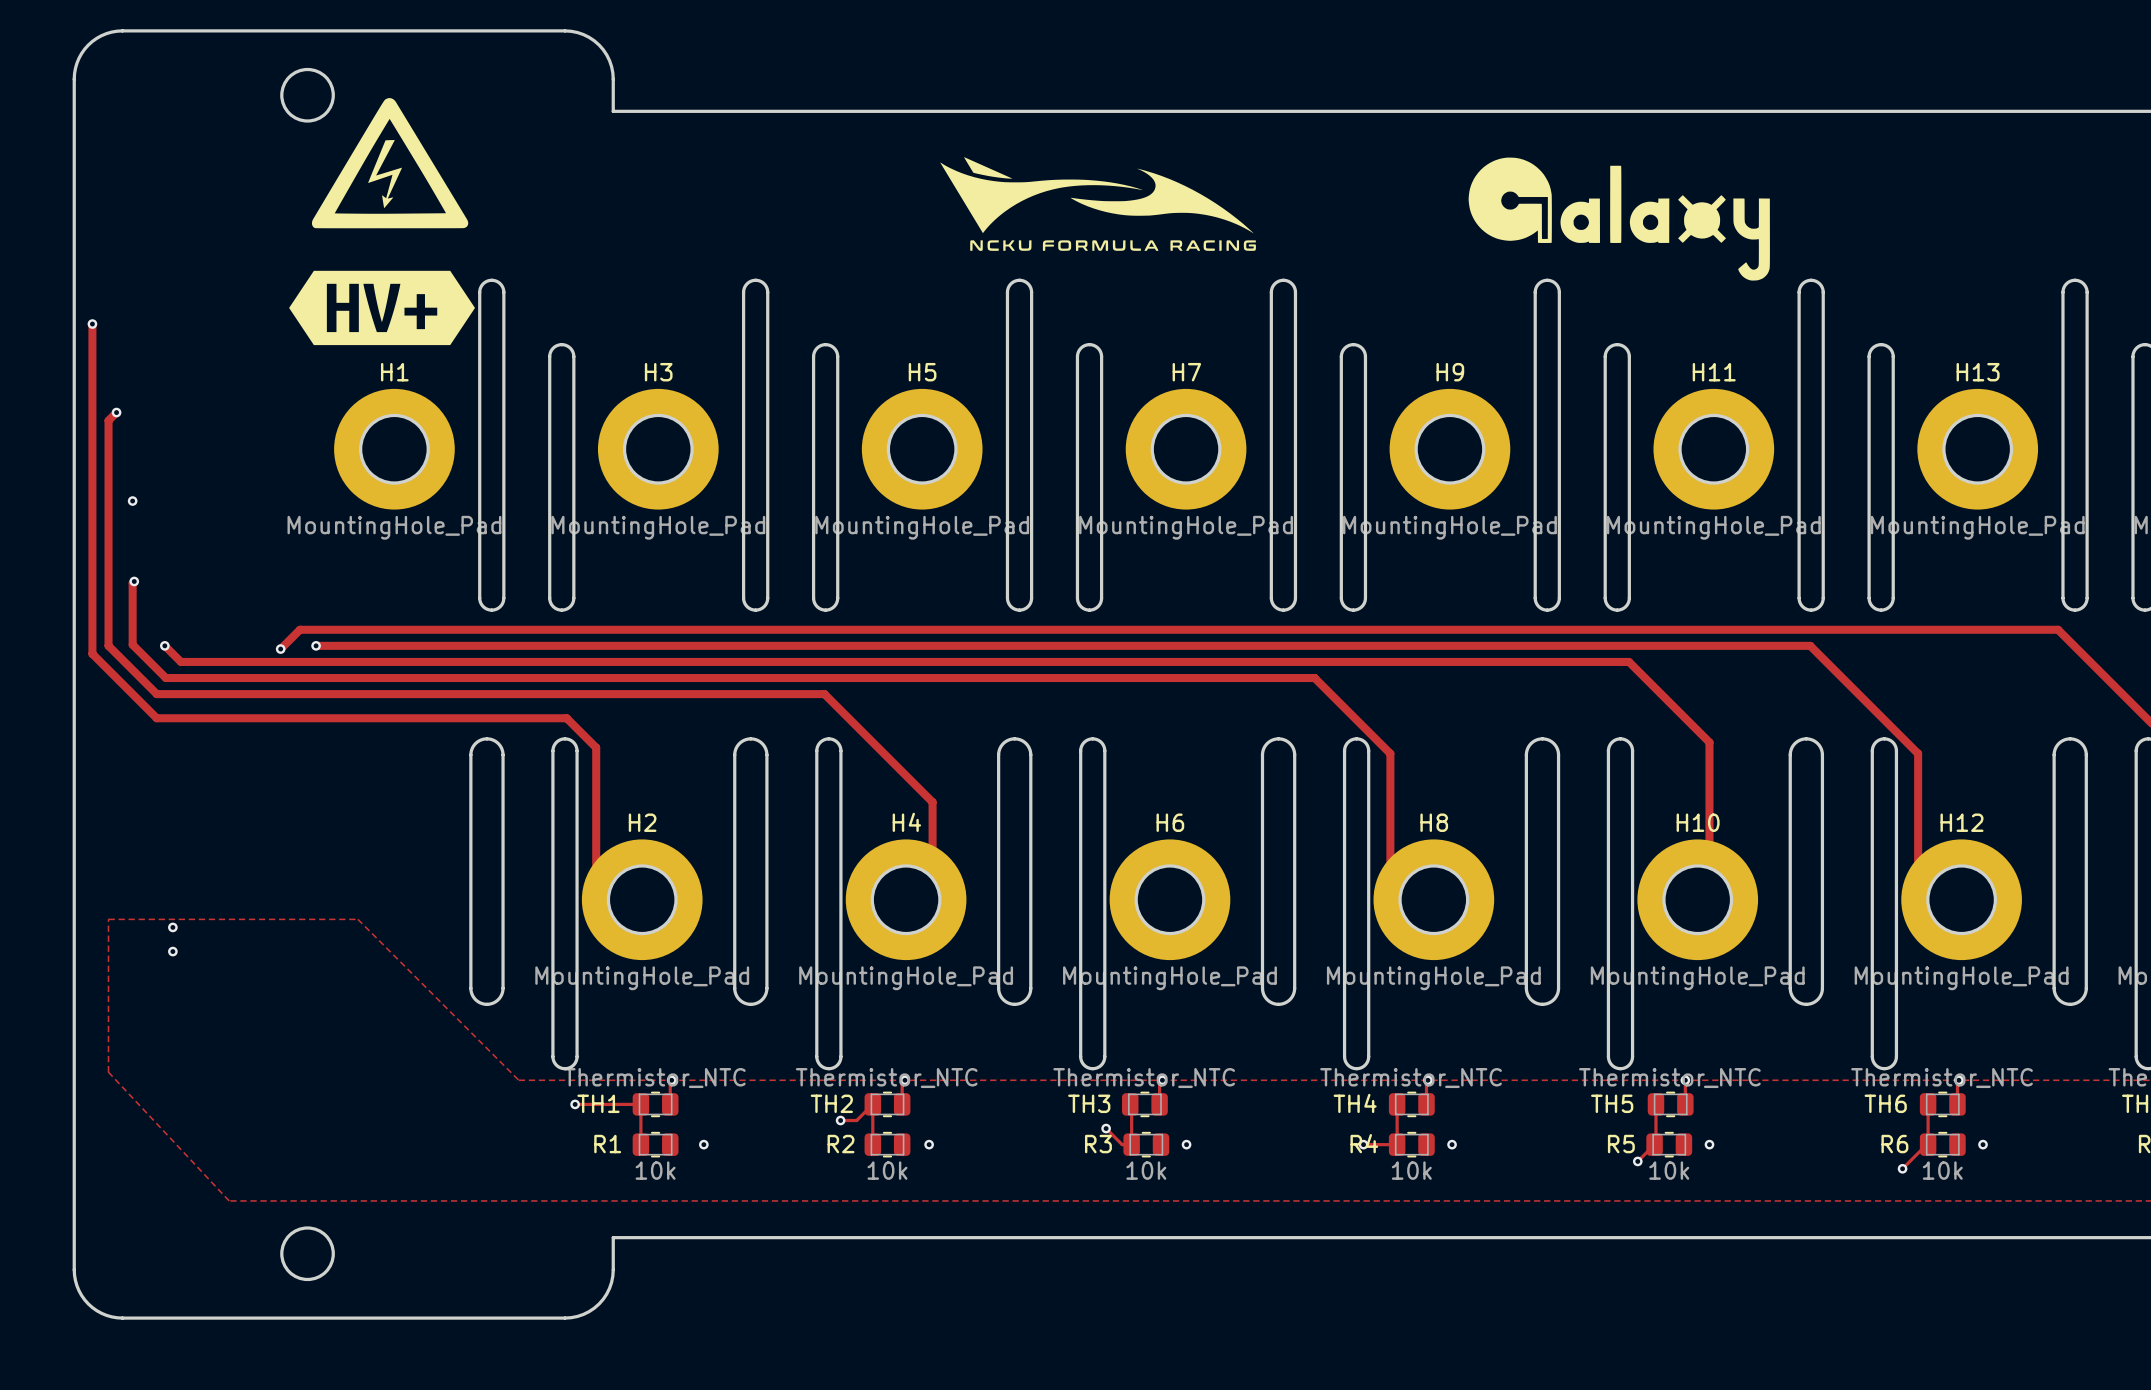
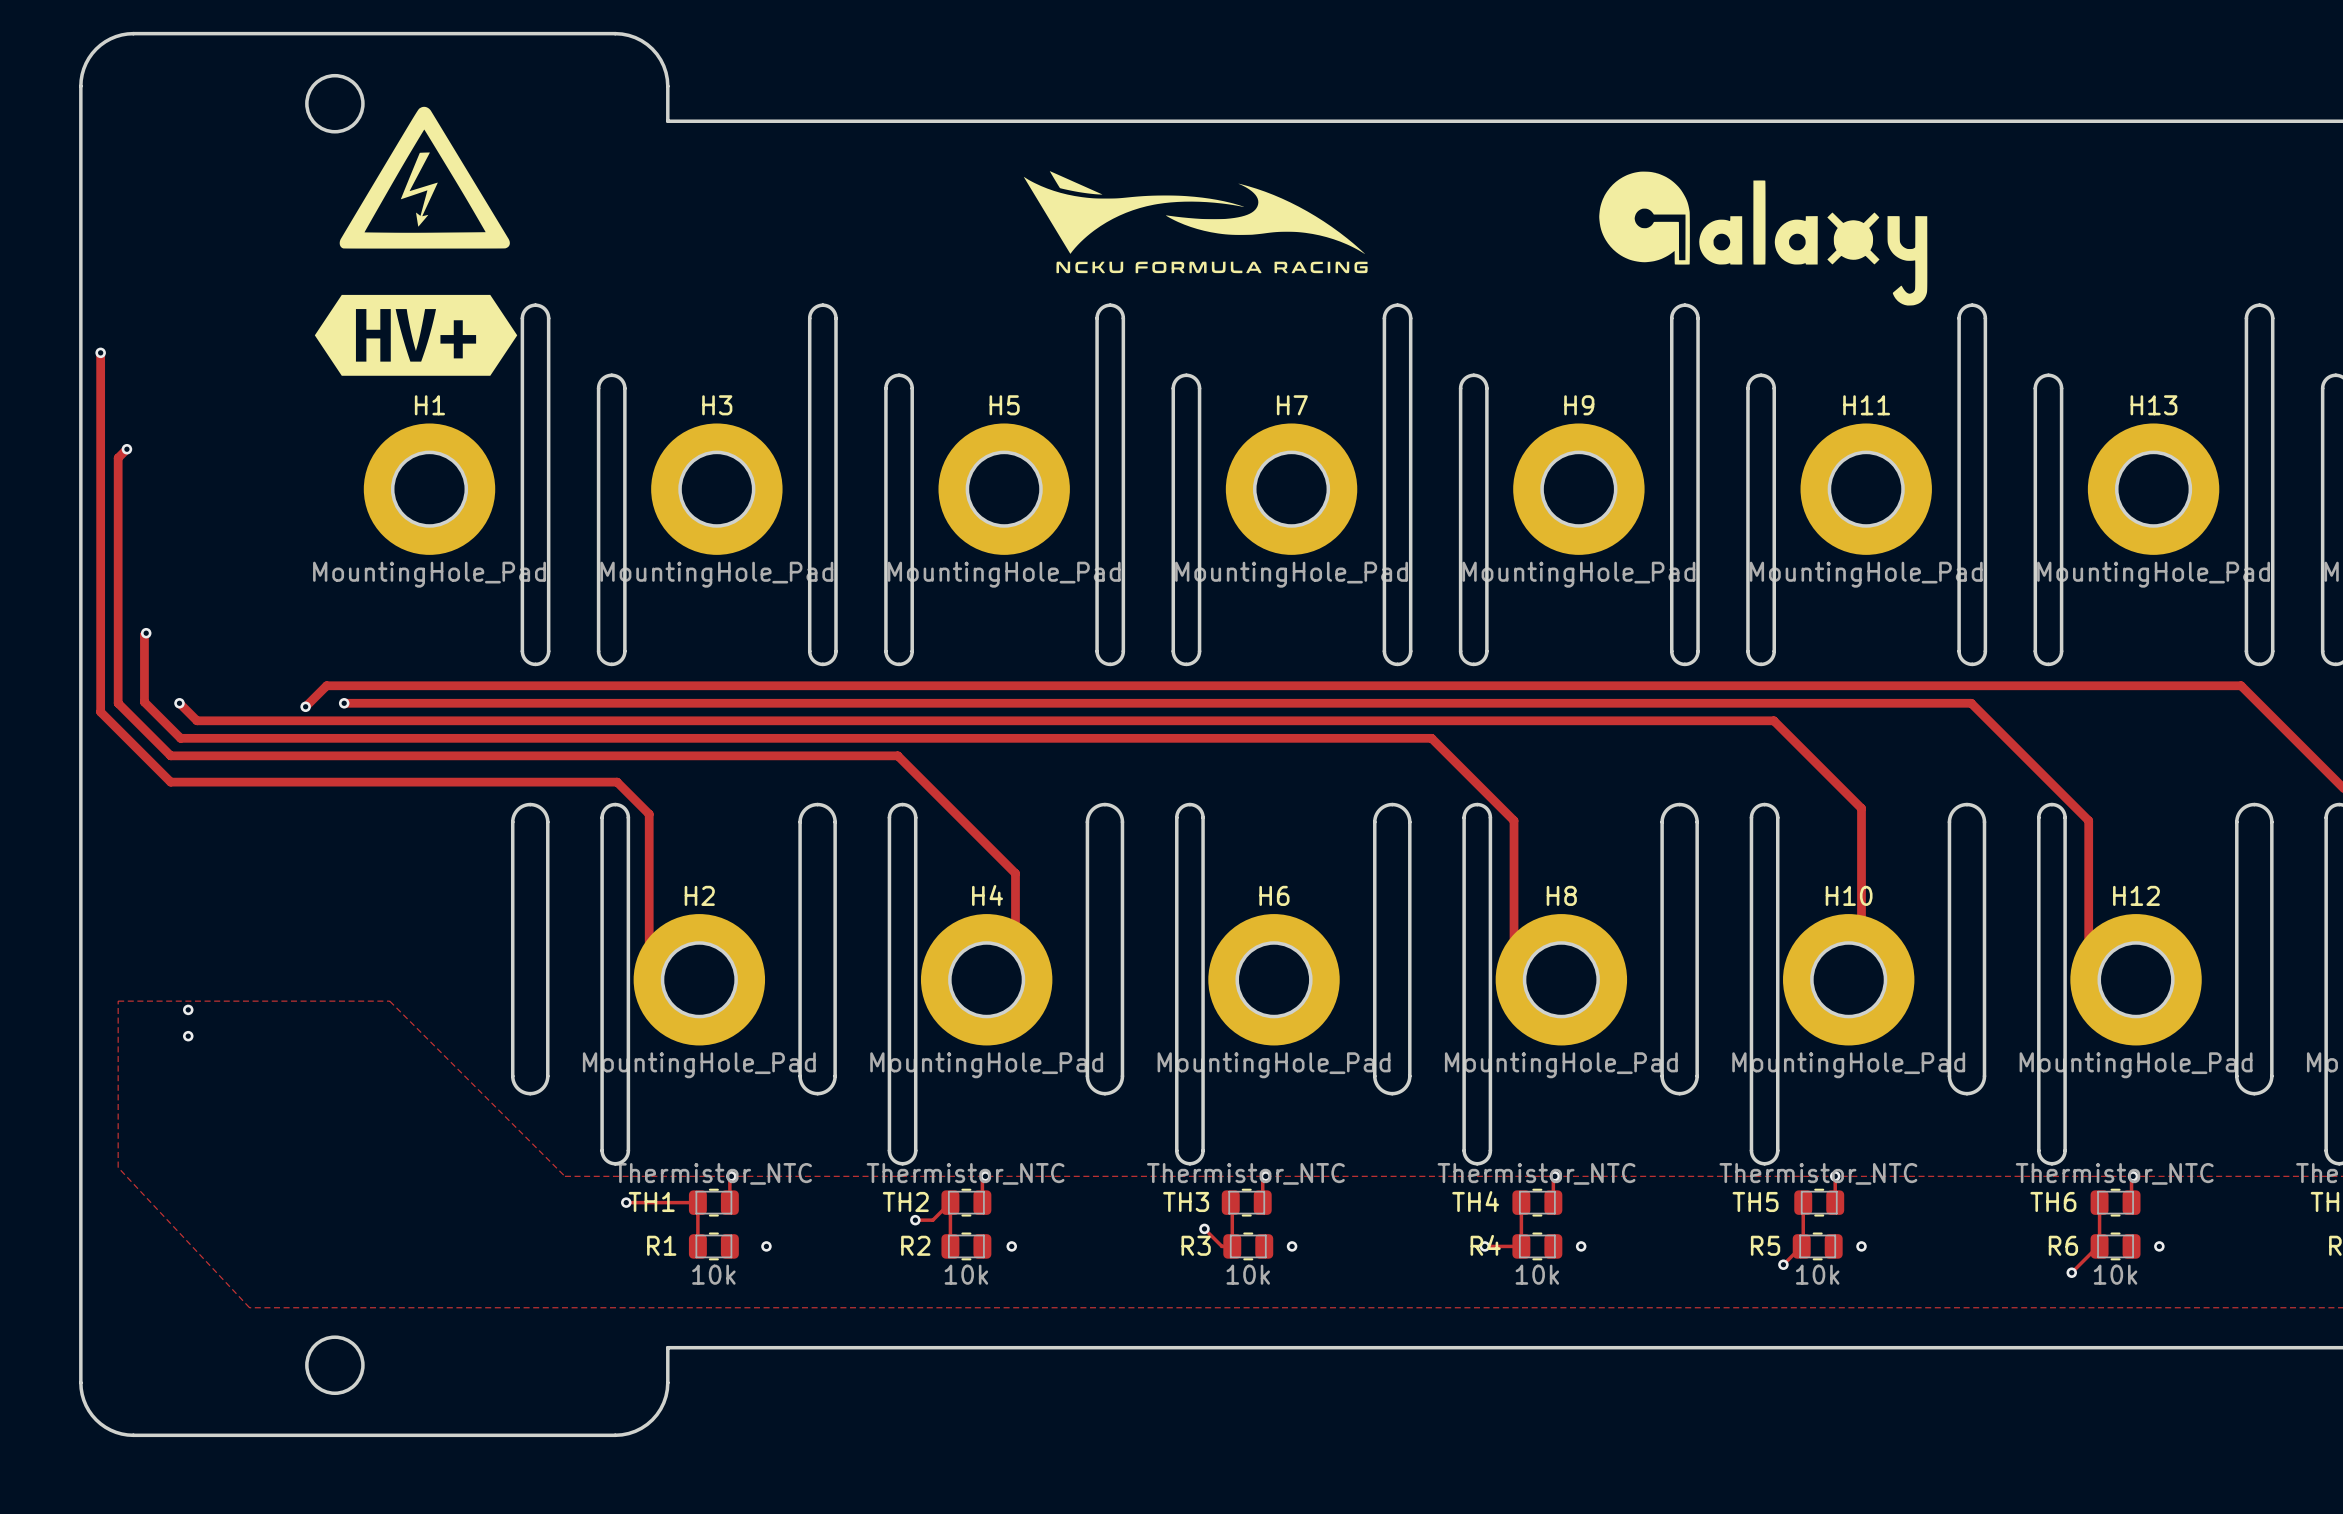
via: (132, 501) -> none

